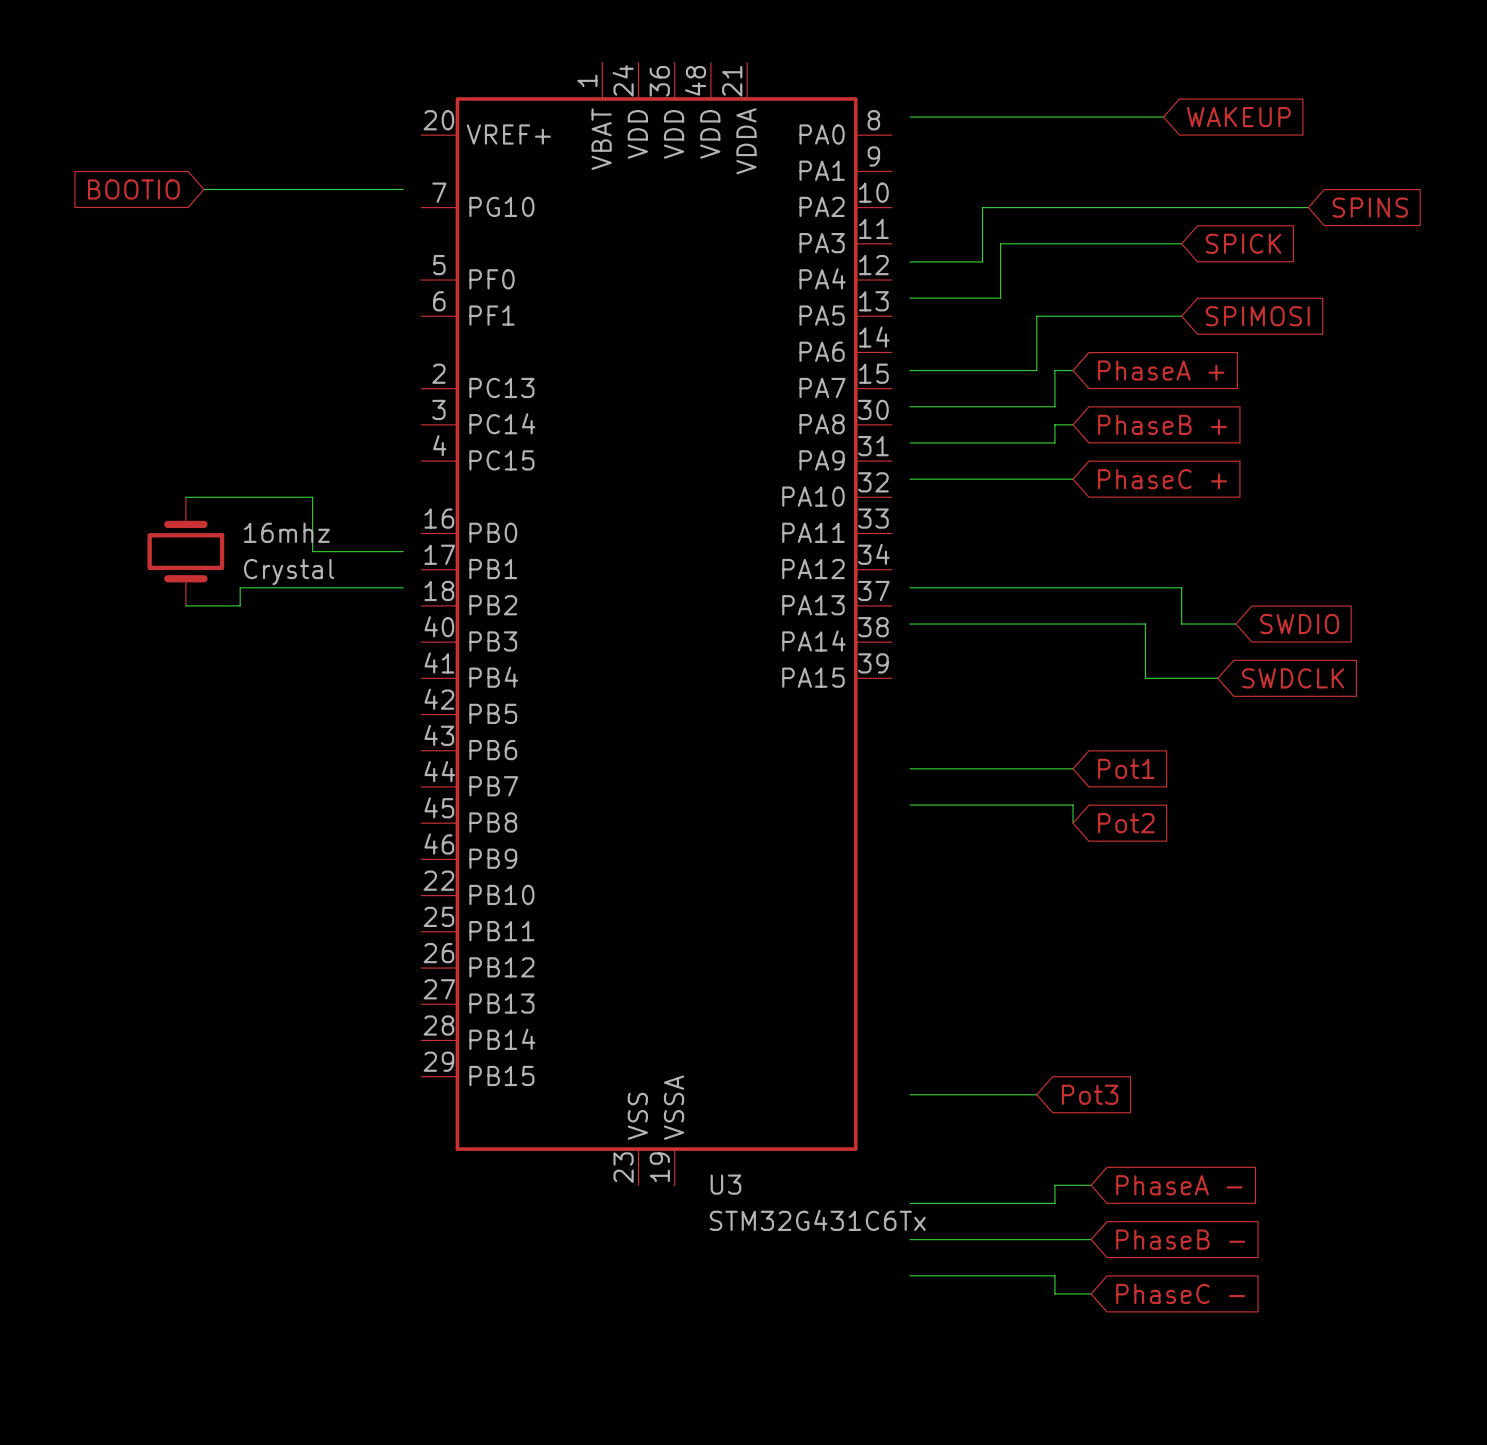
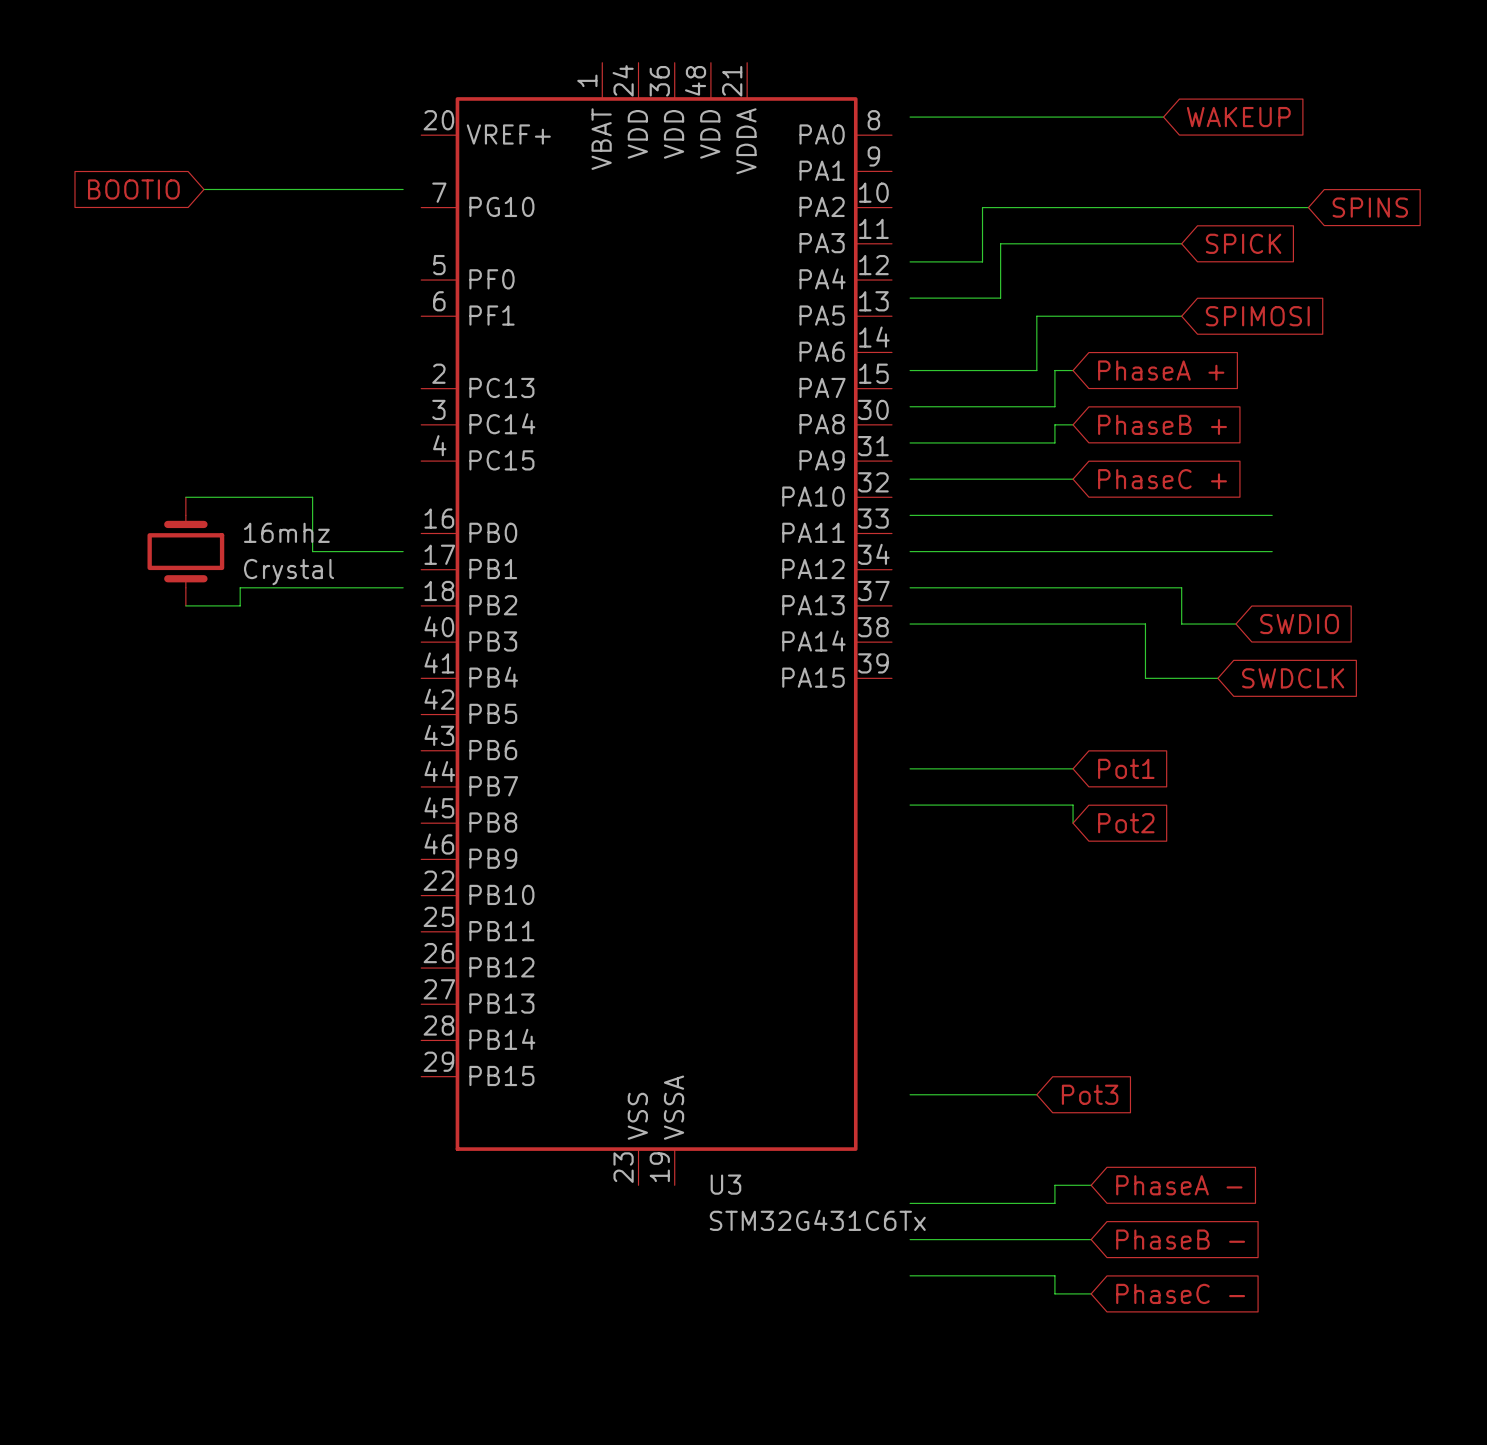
wire: none -> (910, 515) (1272, 515)
wire: none -> (910, 551) (1272, 551)

